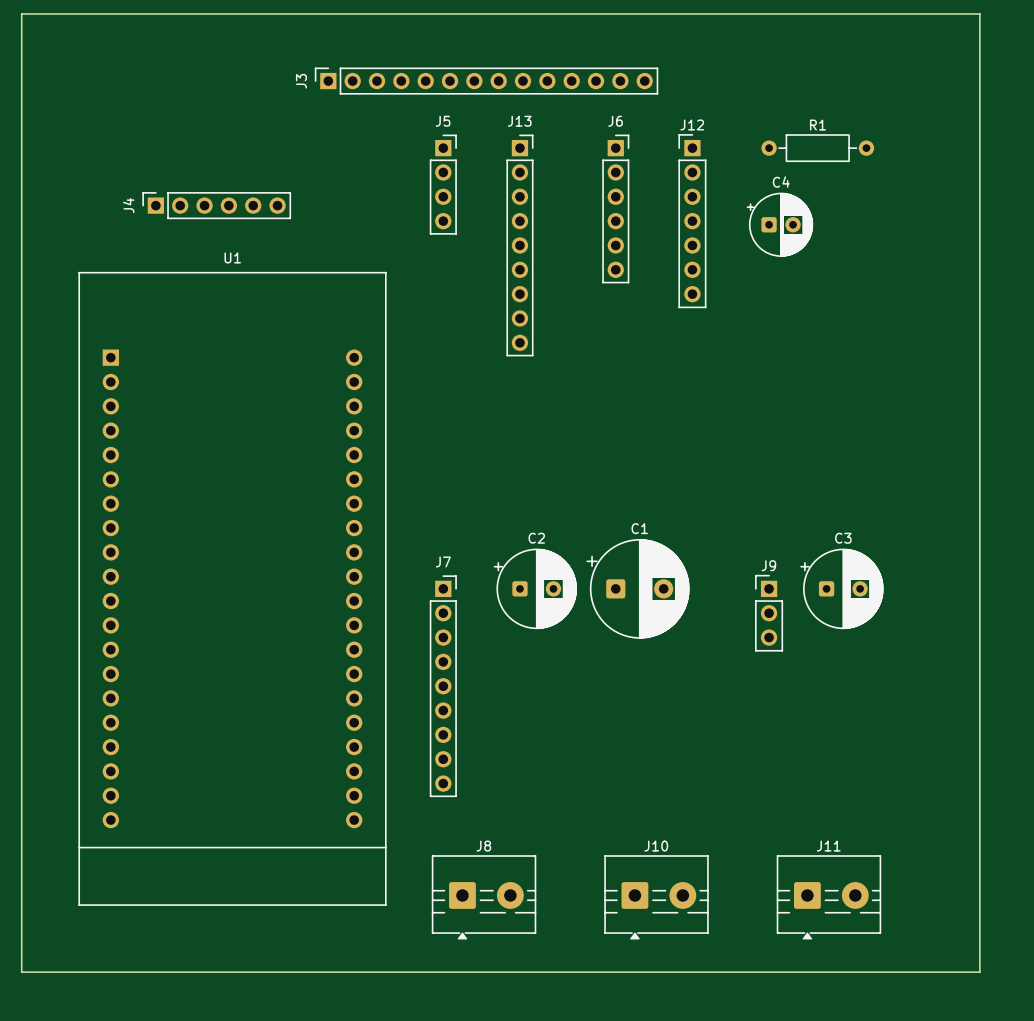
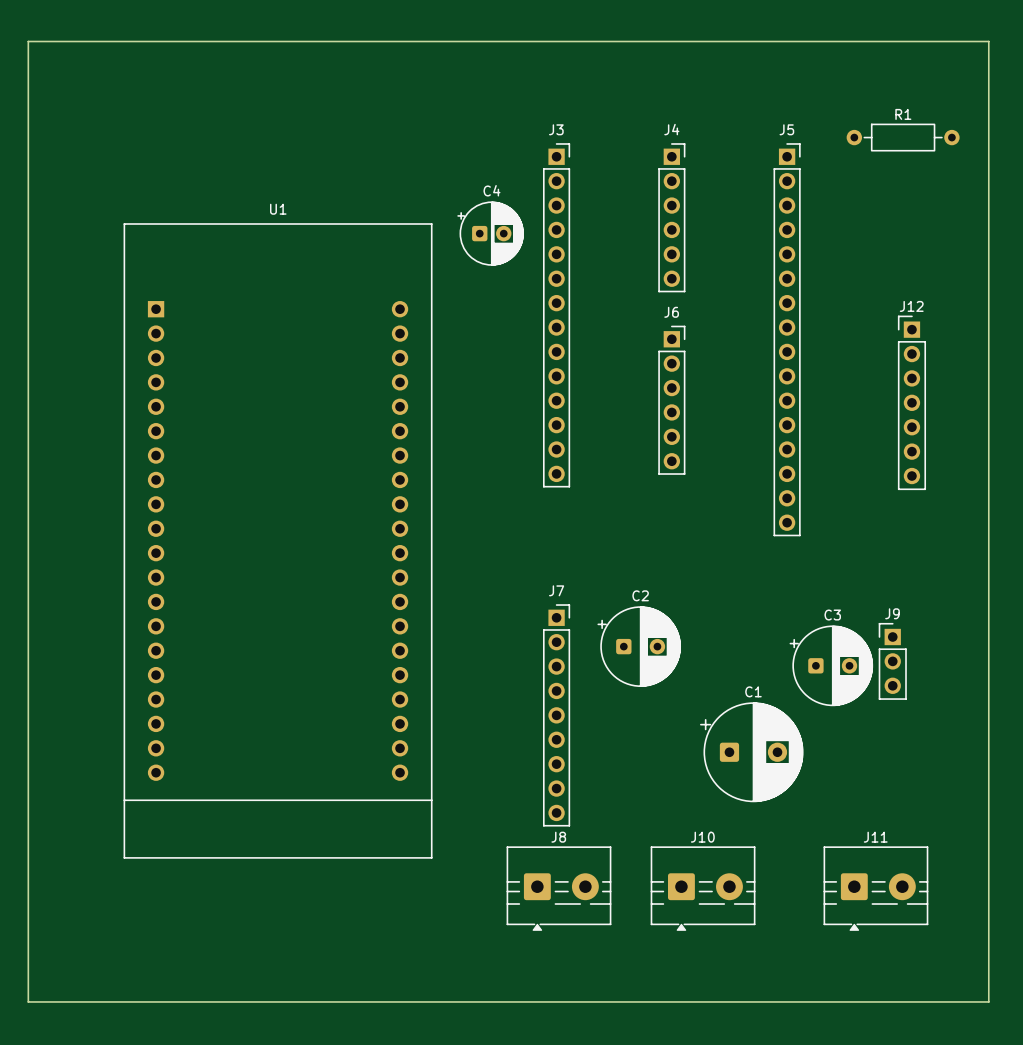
J3 rotation: 0° (486, 81) -> 90° clockwise (556, 315)
J3 position: (486, 81) -> (556, 315)
J5 name position: J5 (443, 121) -> J5 (786, 129)
J5 footprint: [429, 134, 457, 235] -> [773, 143, 801, 537]
R1 position: (817, 148) -> (903, 137)
J4 rotation: 0° (216, 205) -> 90° clockwise (671, 217)
J4 position: (216, 205) -> (671, 217)
J6 position: (615, 208) -> (671, 400)
J12 position: (692, 221) -> (911, 402)
C4 position: (779, 224) -> (490, 233)
J13: (519, 245) -> none
U1 position: (232, 588) -> (278, 540)
C2 position: (535, 588) -> (639, 646)
C1 position: (638, 588) -> (751, 752)
C3 position: (841, 588) -> (831, 665)
J9 position: (769, 613) -> (892, 661)
J7 position: (443, 686) -> (556, 715)
J8 position: (484, 897) -> (558, 888)
J10 position: (656, 897) -> (703, 888)
J11 position: (828, 897) -> (875, 888)

